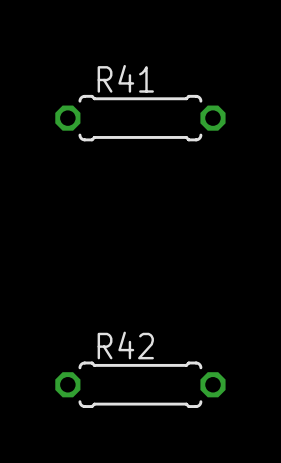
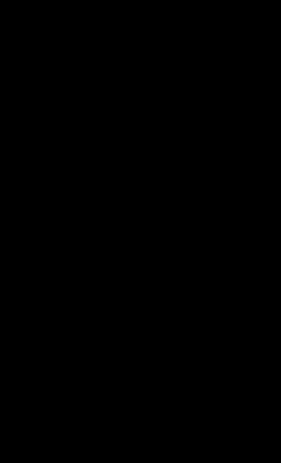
R41: (140, 118) -> none
R42: (140, 384) -> none

